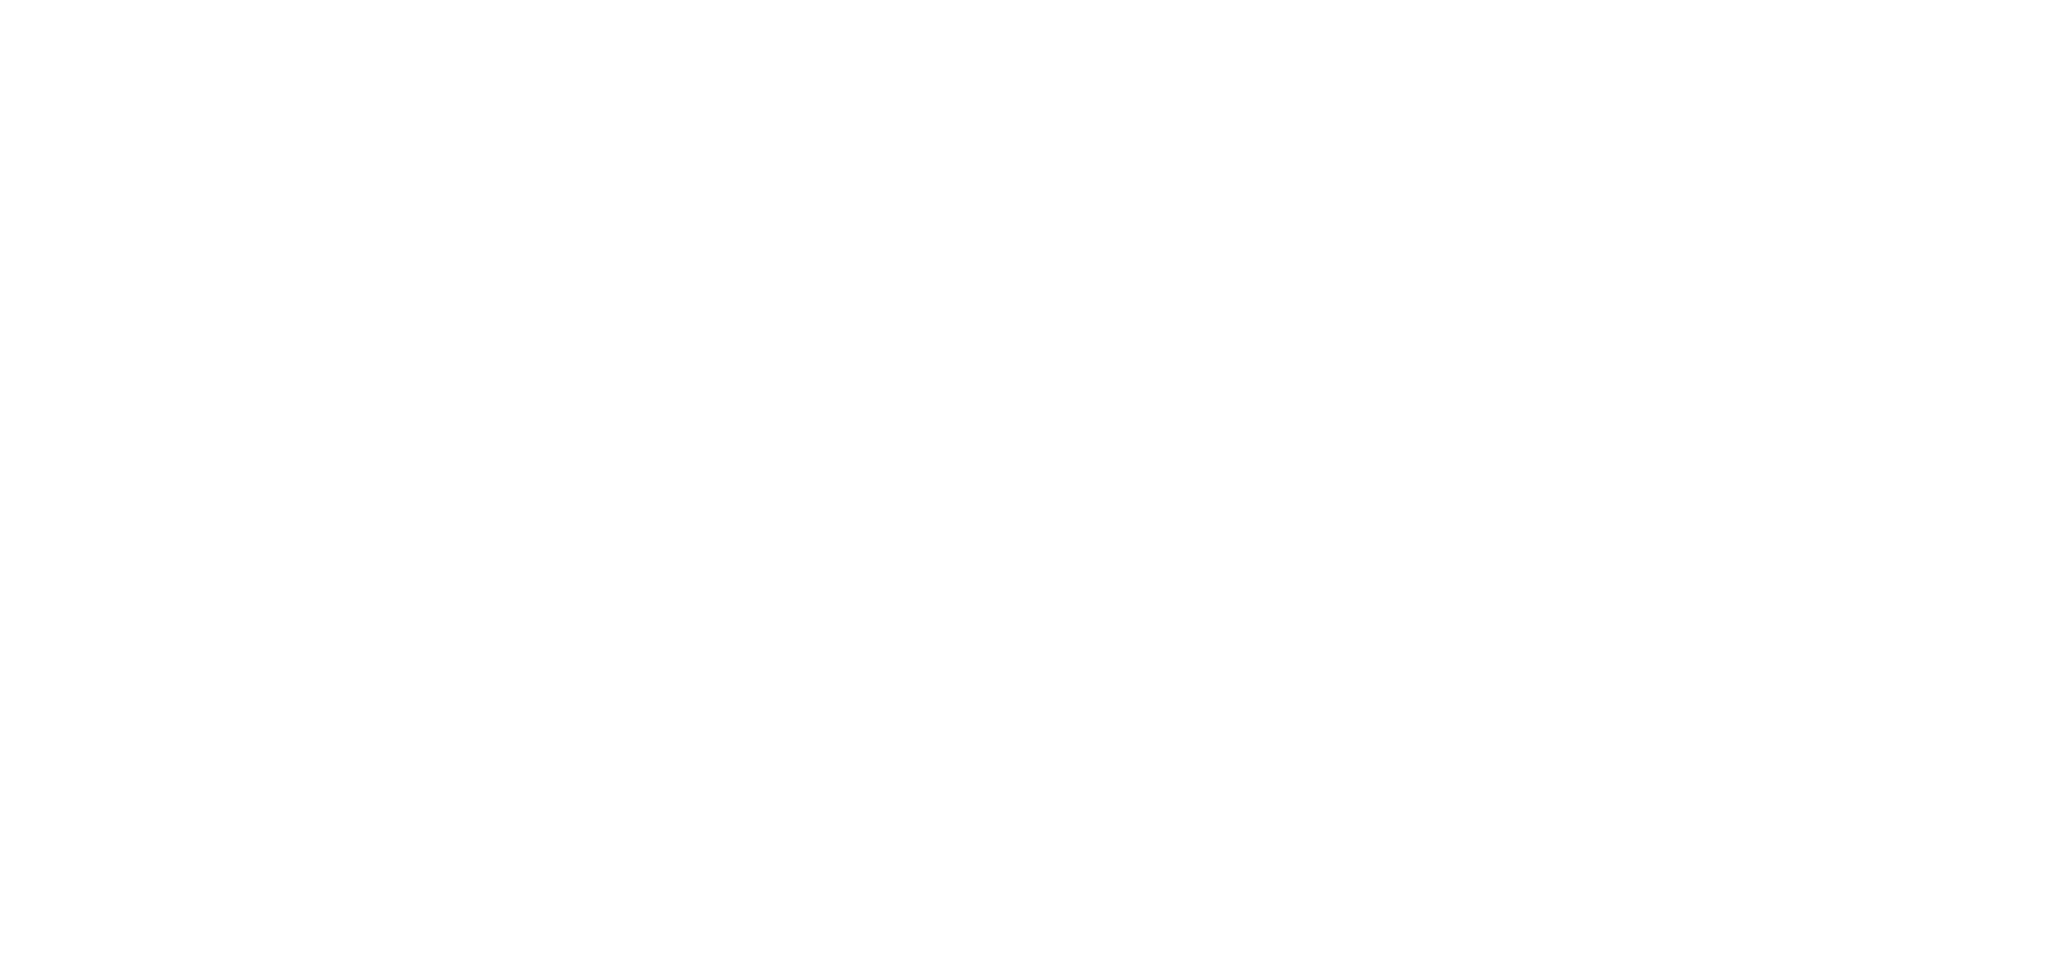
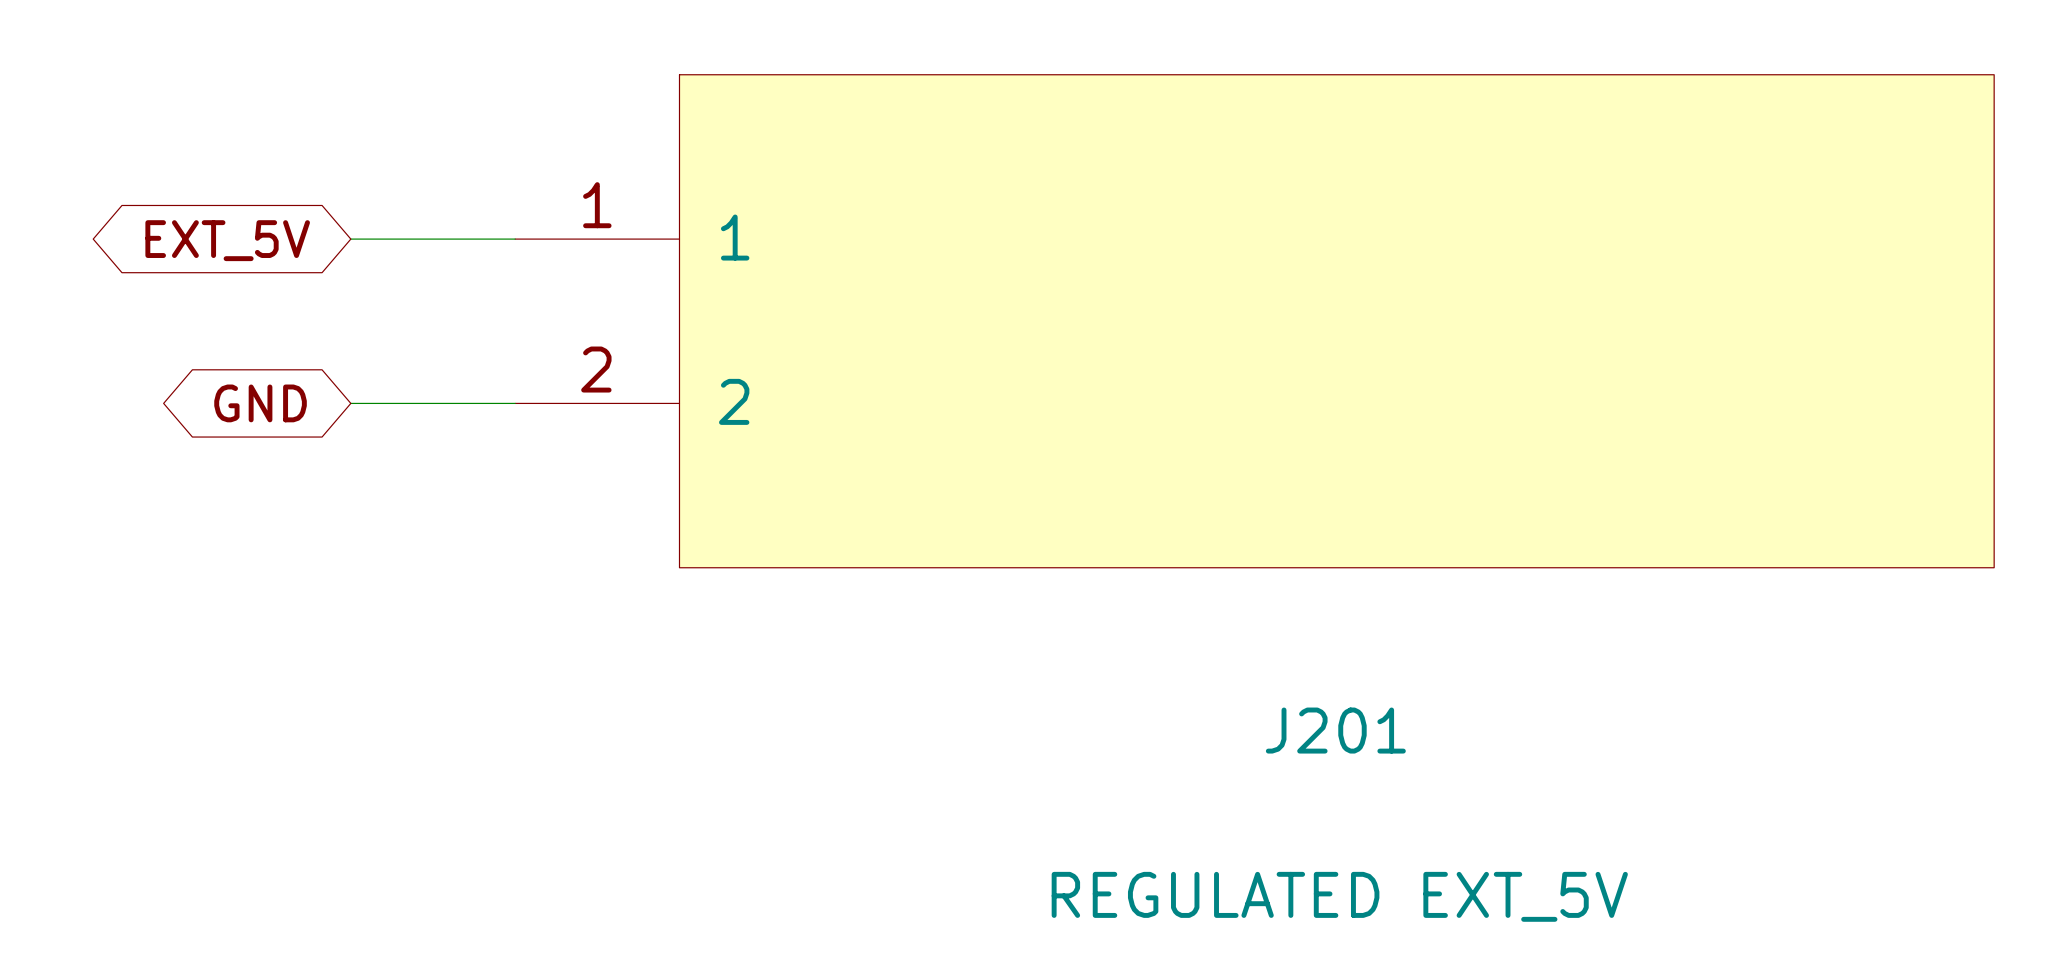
wire: none -> (350, 239) (515, 239)
global label: none -> EXT_5V (227, 240)
J201: none -> REGULATED EXT_5V (1254, 321)
global label: none -> GND (260, 403)
wire: none -> (350, 403) (515, 403)

